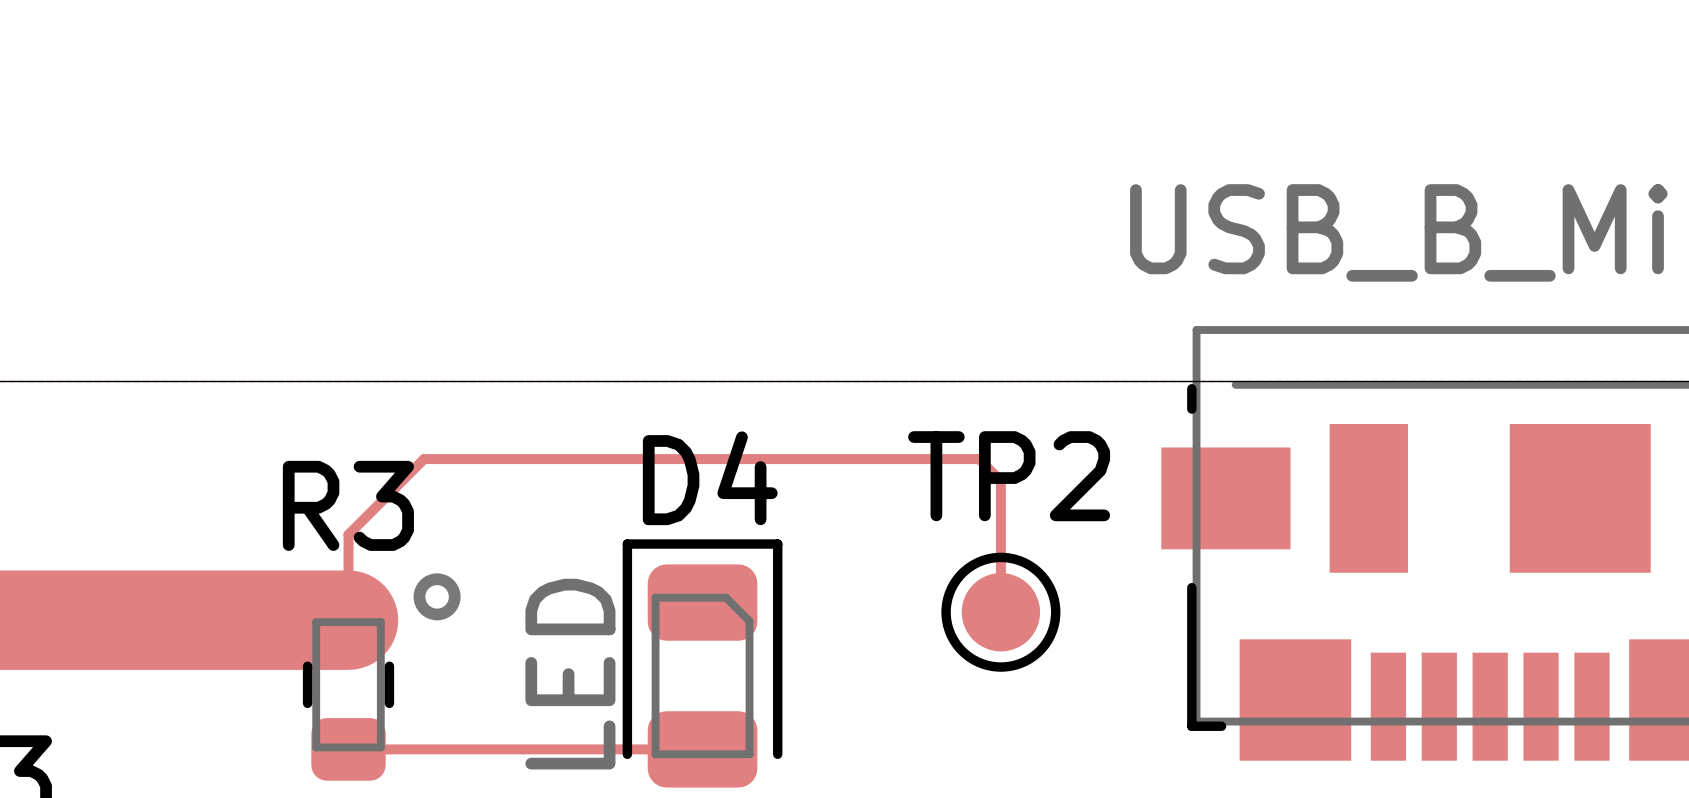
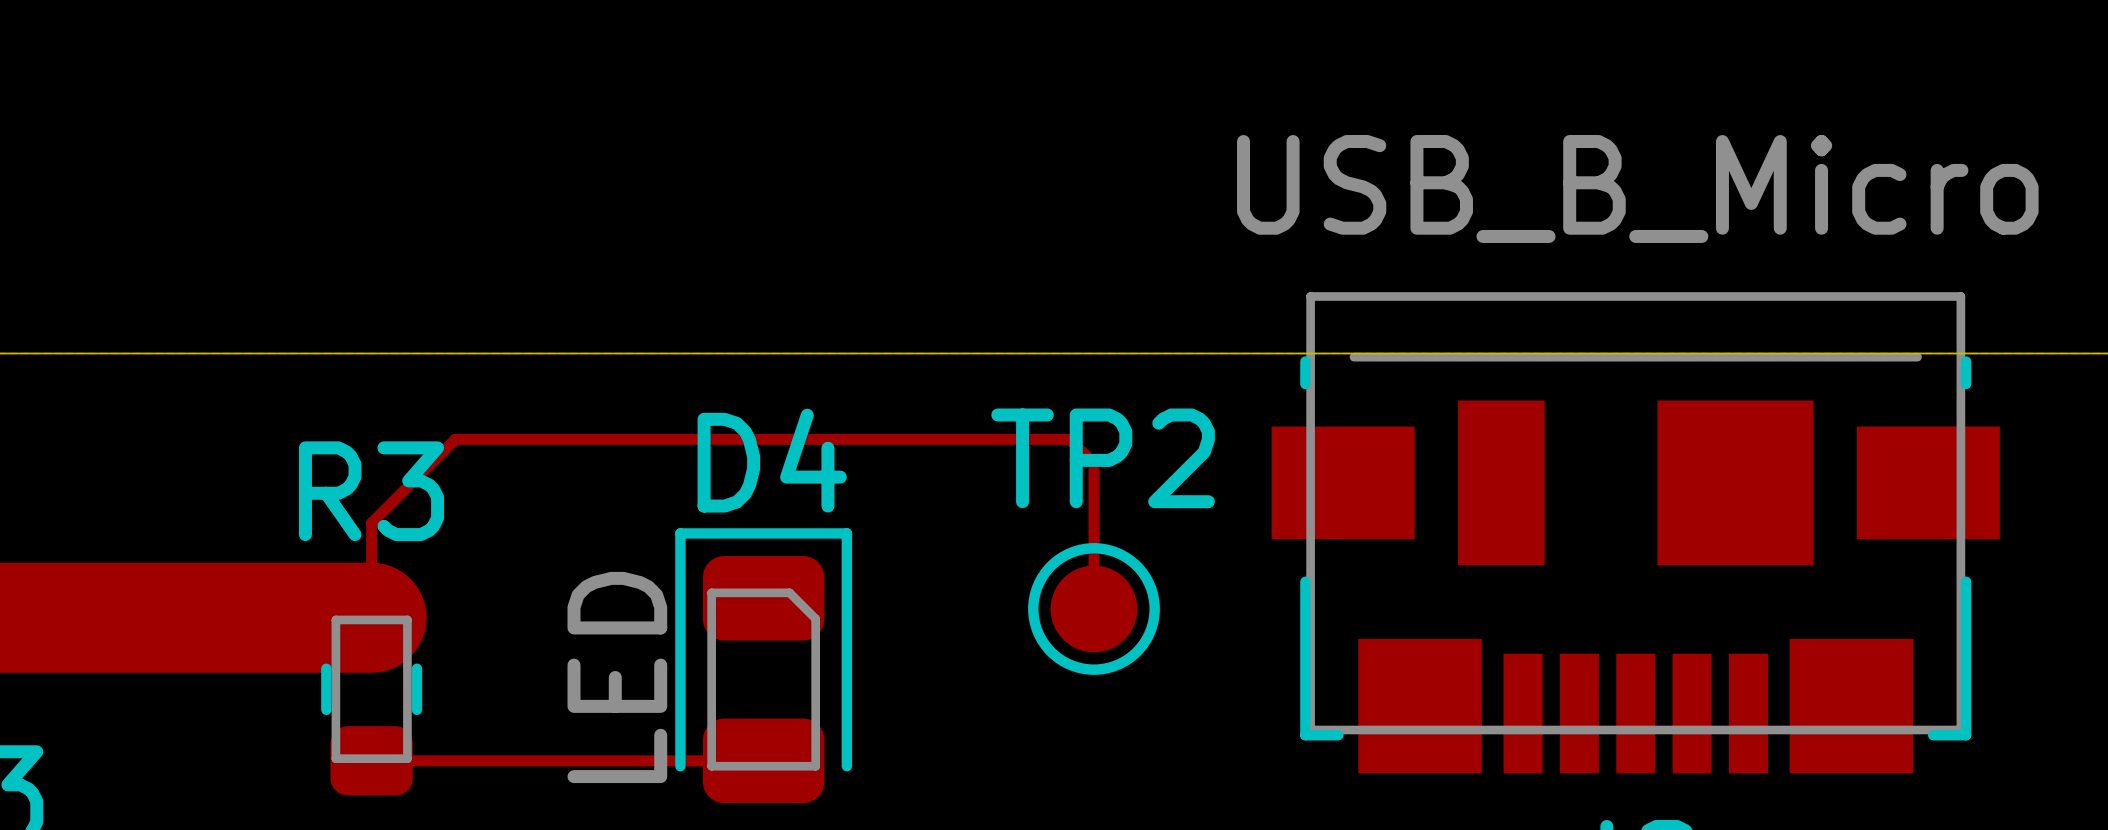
via: (437, 596) -> none

